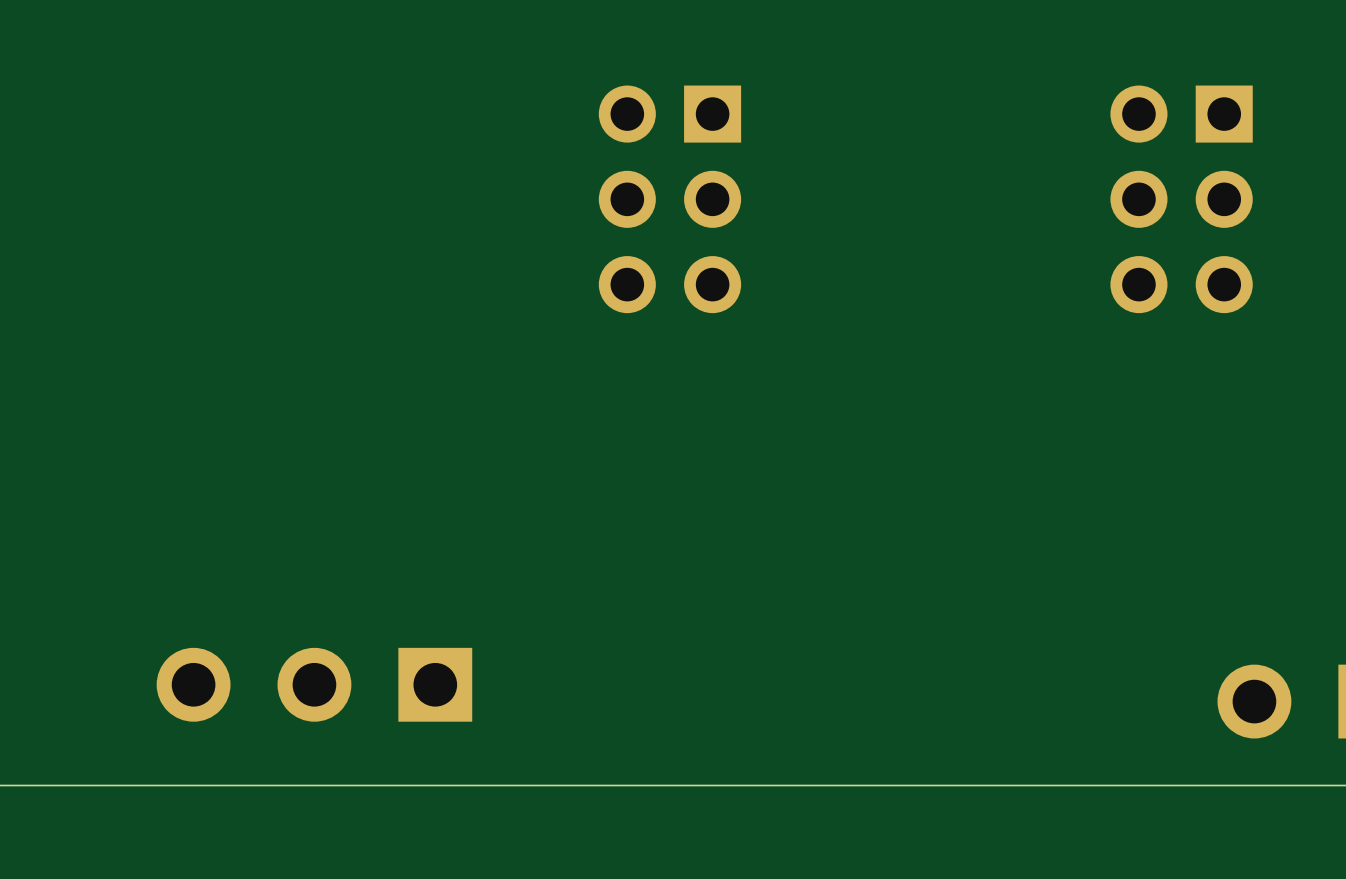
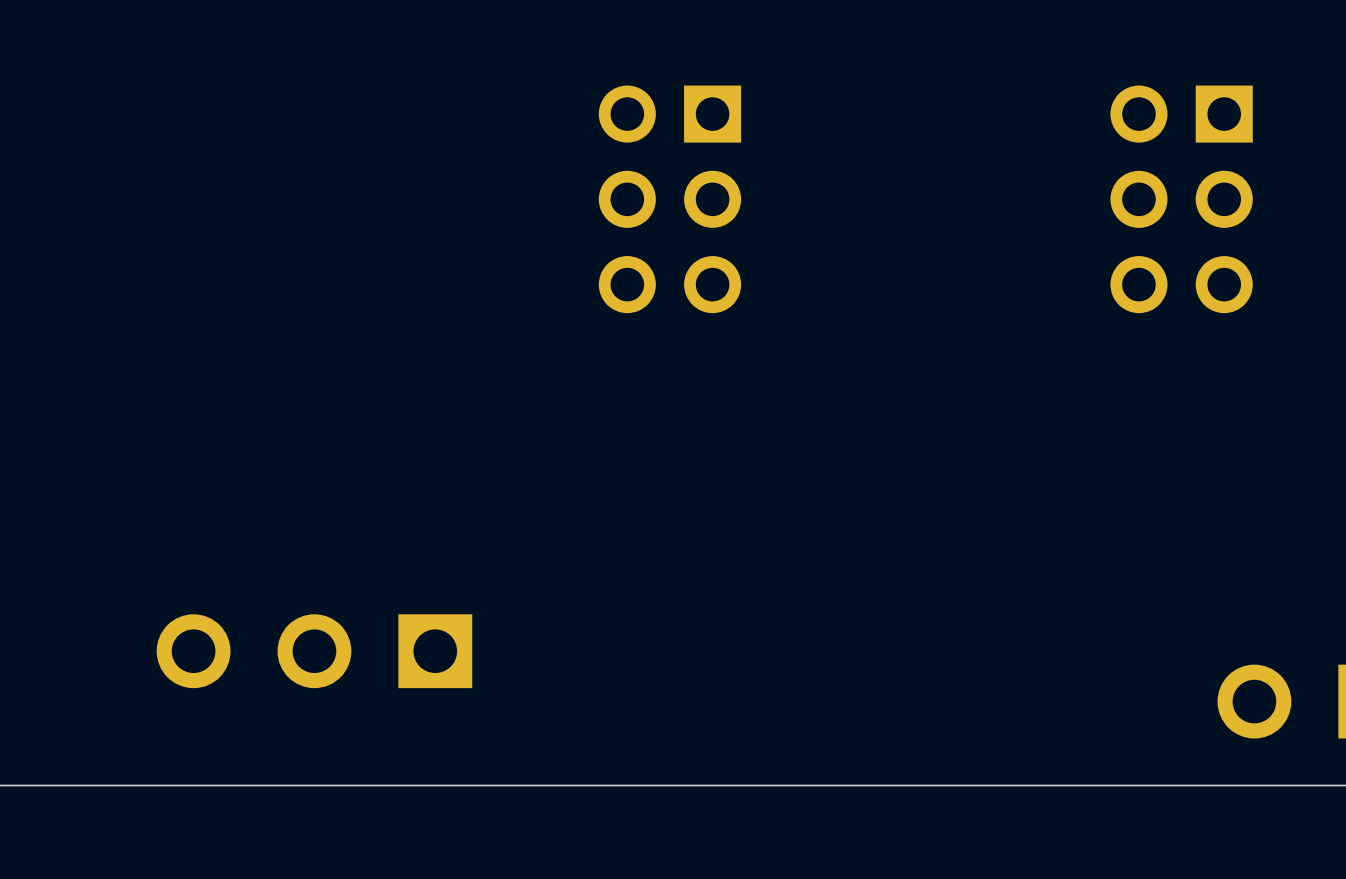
part position: (314, 684) -> (314, 651)

